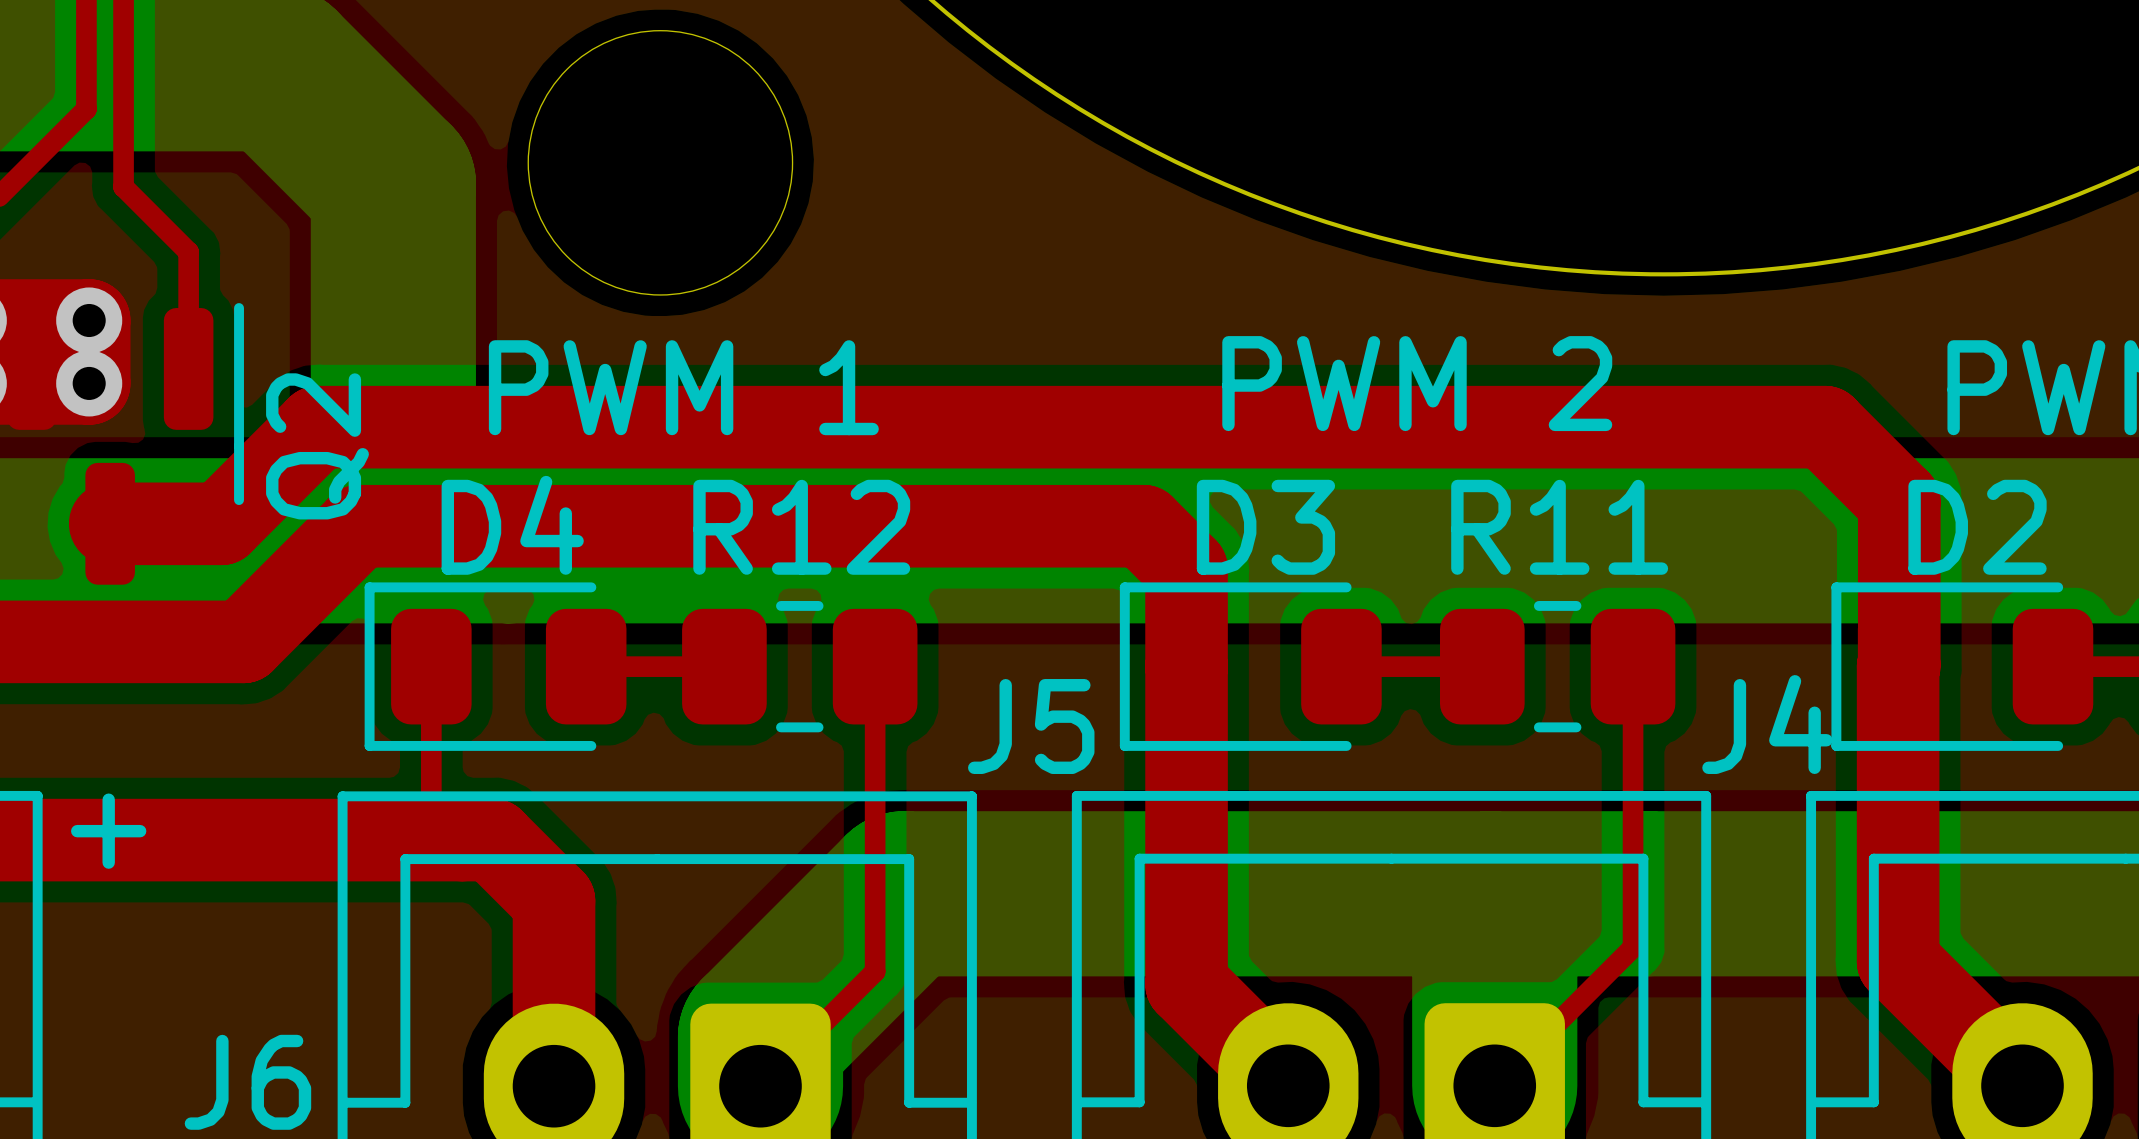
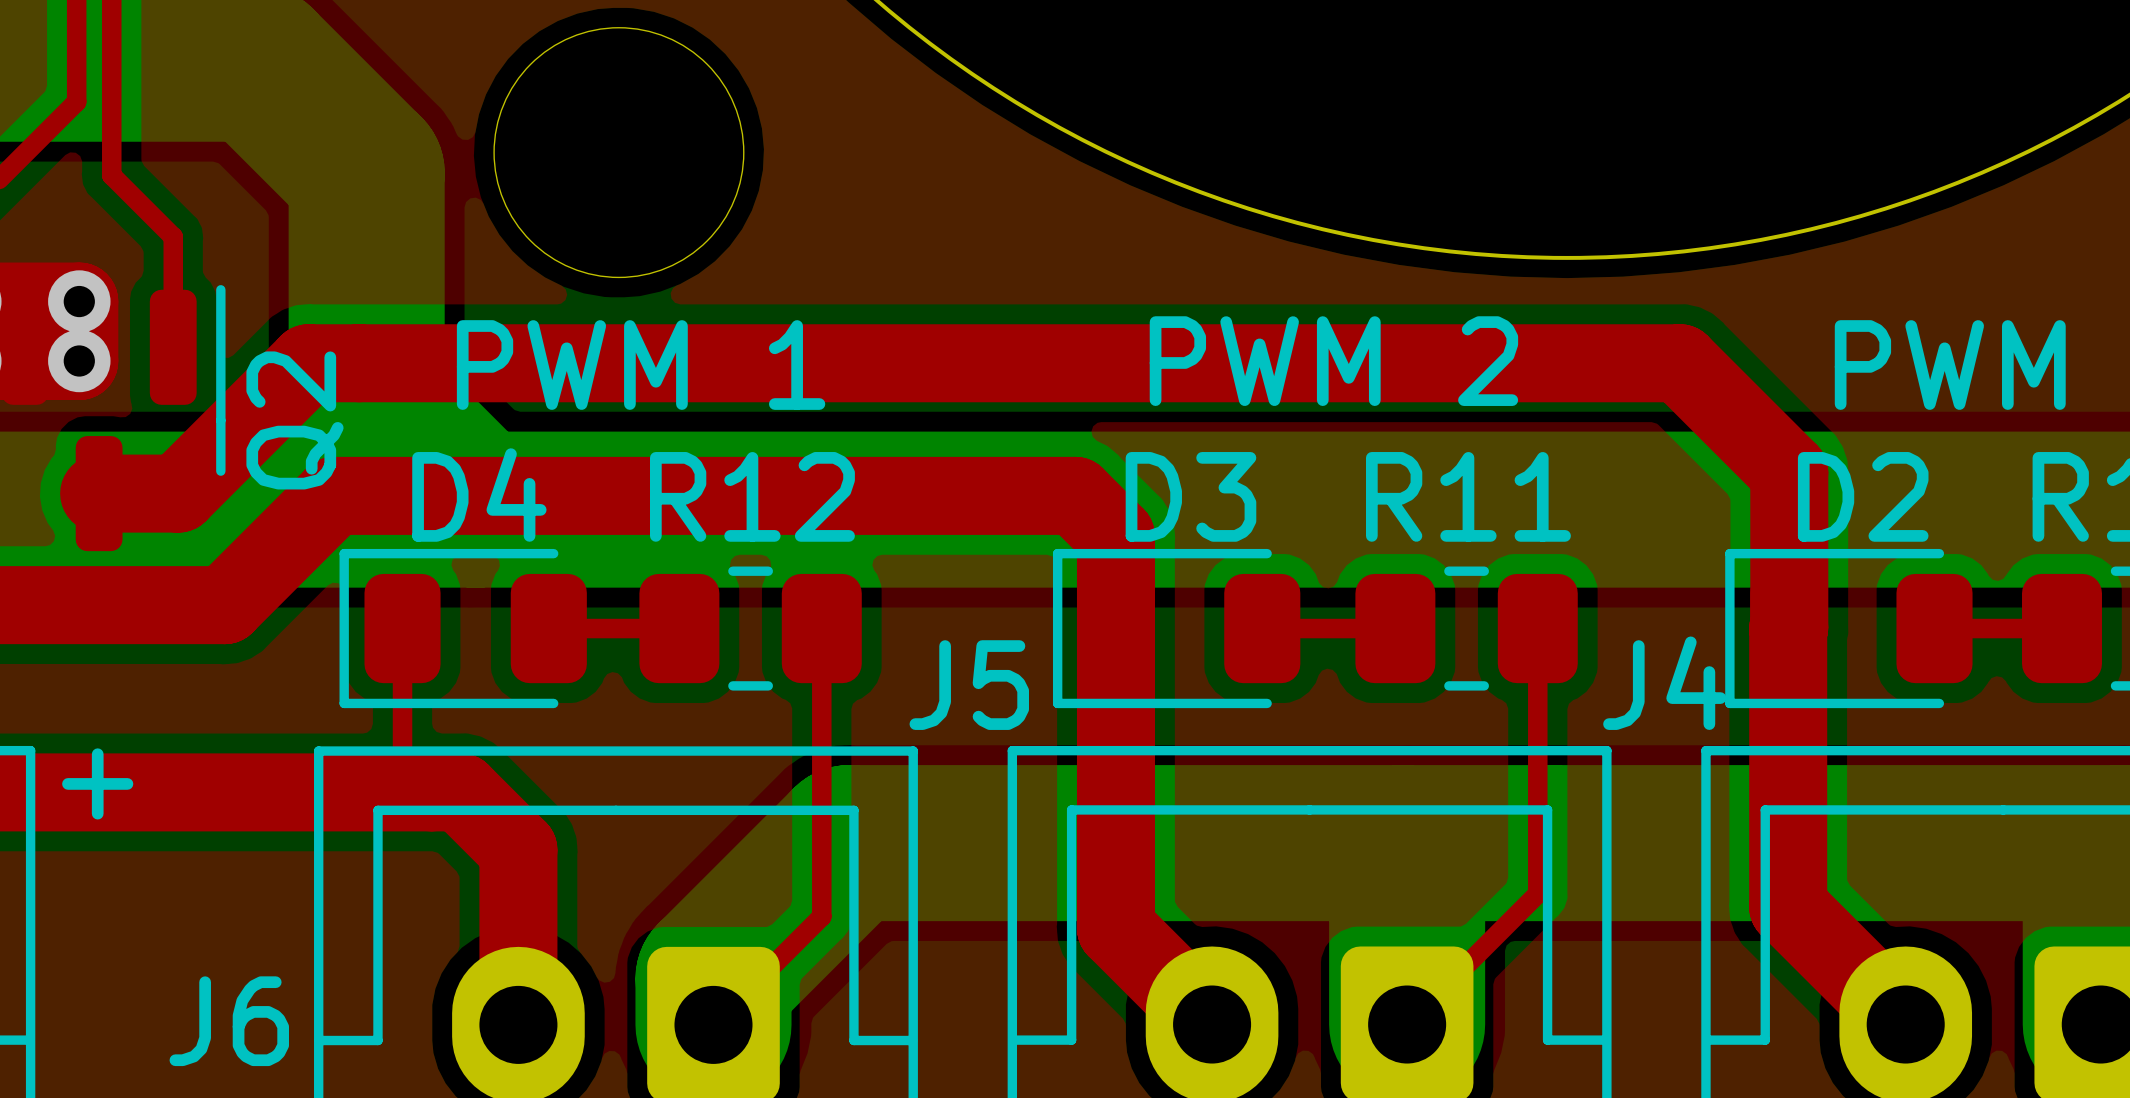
top track: (1824, 427) (317, 427) (221, 523) (193, 523) -> (1719, 402) (1680, 363) (308, 363) (178, 493)

